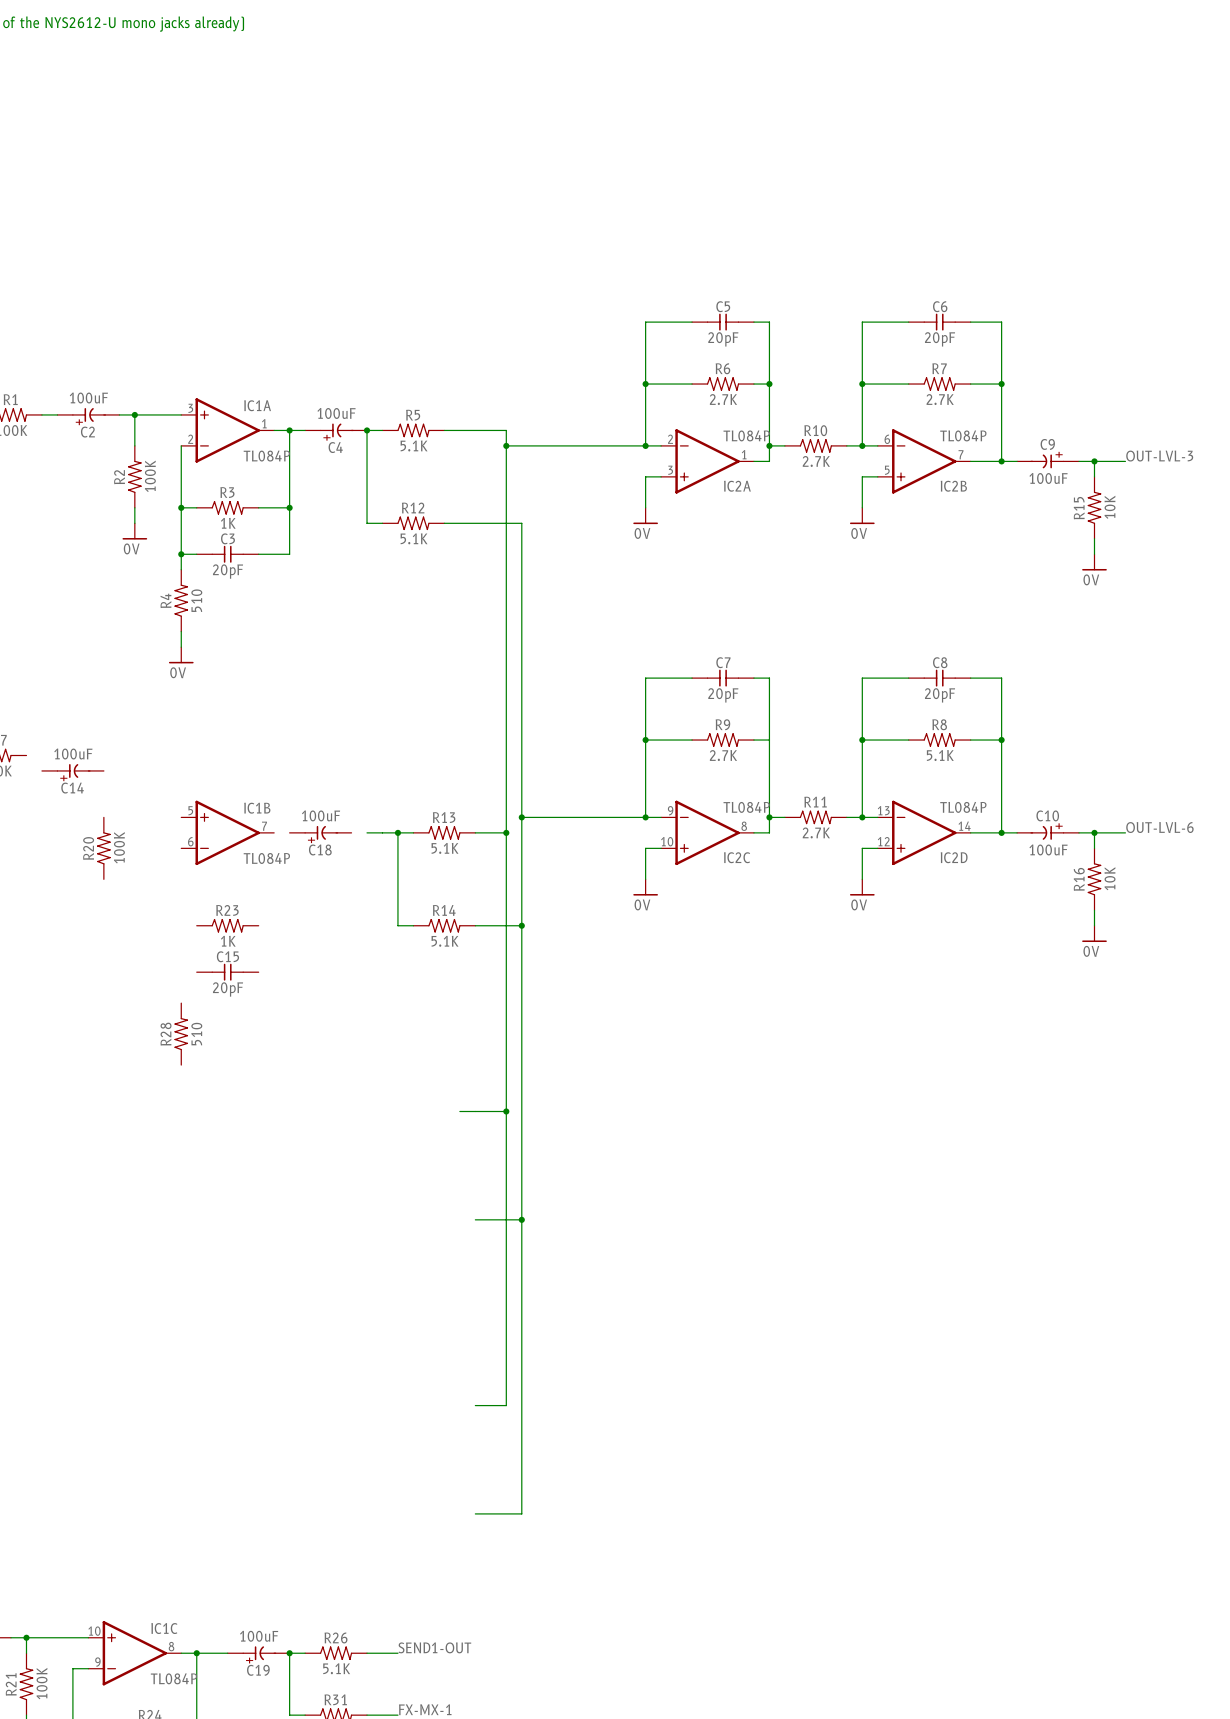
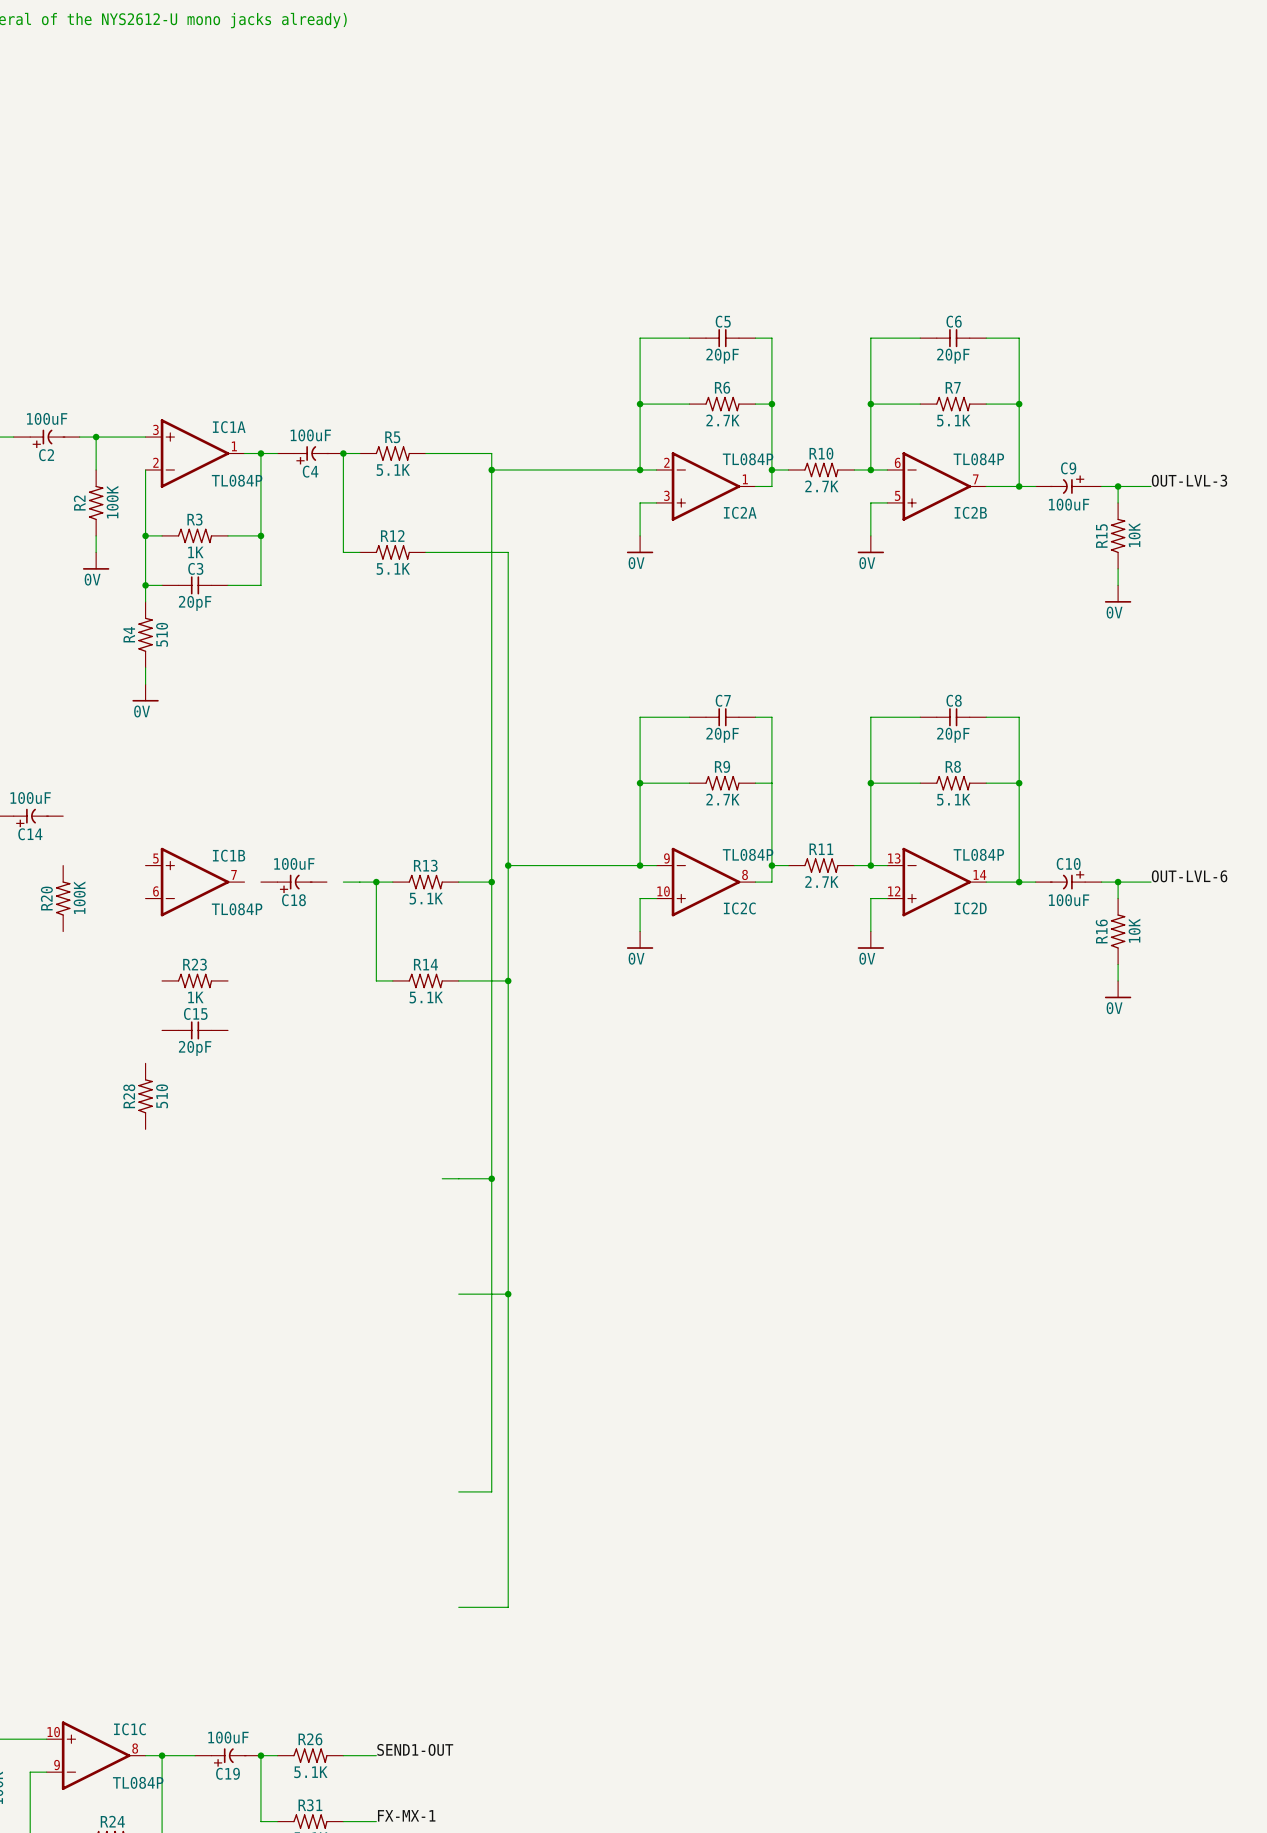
R7 value: 2.7K (940, 399) -> 5.1K (953, 420)

